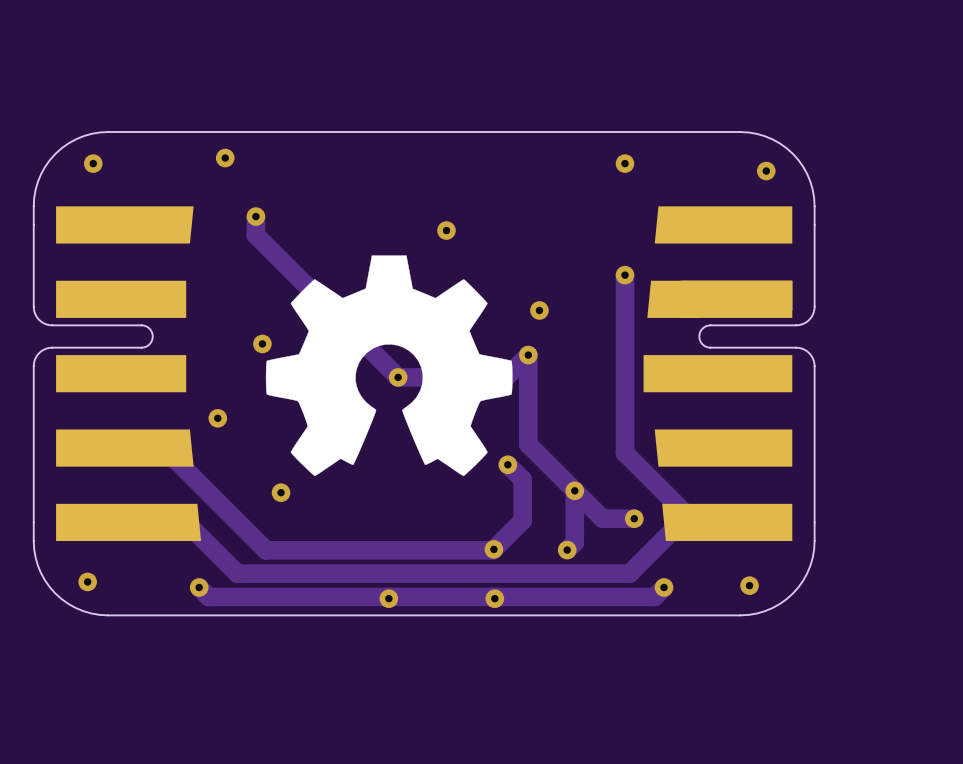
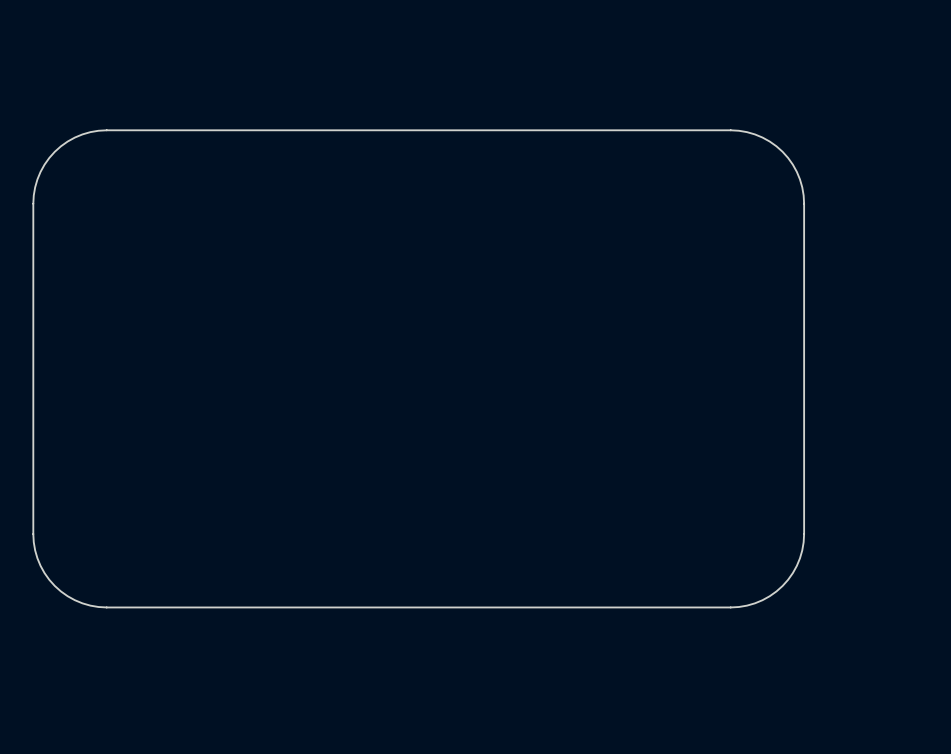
via: (225, 158) -> none
via: (93, 163) -> none
via: (624, 163) -> none
via: (766, 171) -> none
track: (255, 216) (255, 235) (398, 377) (505, 377) (528, 355) (528, 444) (602, 518) (634, 518) -> none
via: (255, 216) -> none
board edge: none -> (33, 222) (33, 515)
board edge: none -> (804, 222) (804, 515)
via: (446, 230) -> none
drawing: [265, 255, 513, 477] -> none
track: (624, 275) (624, 453) (694, 522) -> none
via: (624, 275) -> none
via: (539, 310) -> none
via: (262, 343) -> none
via: (528, 355) -> none
part: (116, 373) -> none
part: (729, 373) -> none
via: (398, 377) -> none
via: (217, 418) -> none
track: (122, 448) (163, 448) (266, 550) (492, 550) (522, 520) (522, 479) (507, 464) -> none
via: (507, 464) -> none
track: (574, 490) (574, 542) (567, 550) -> none
via: (574, 490) -> none
via: (281, 492) -> none
via: (634, 518) -> none
track: (729, 522) (680, 522) (629, 573) (237, 573) (186, 522) (126, 522) -> none
via: (493, 549) -> none
via: (567, 550) -> none
via: (87, 581) -> none
via: (749, 585) -> none
via: (199, 587) -> none
track: (664, 587) (654, 596) (496, 596) (494, 598) (493, 596) (390, 596) (388, 598) (387, 596) (208, 596) (199, 587) -> none
via: (664, 587) -> none
via: (388, 598) -> none
via: (494, 598) -> none

